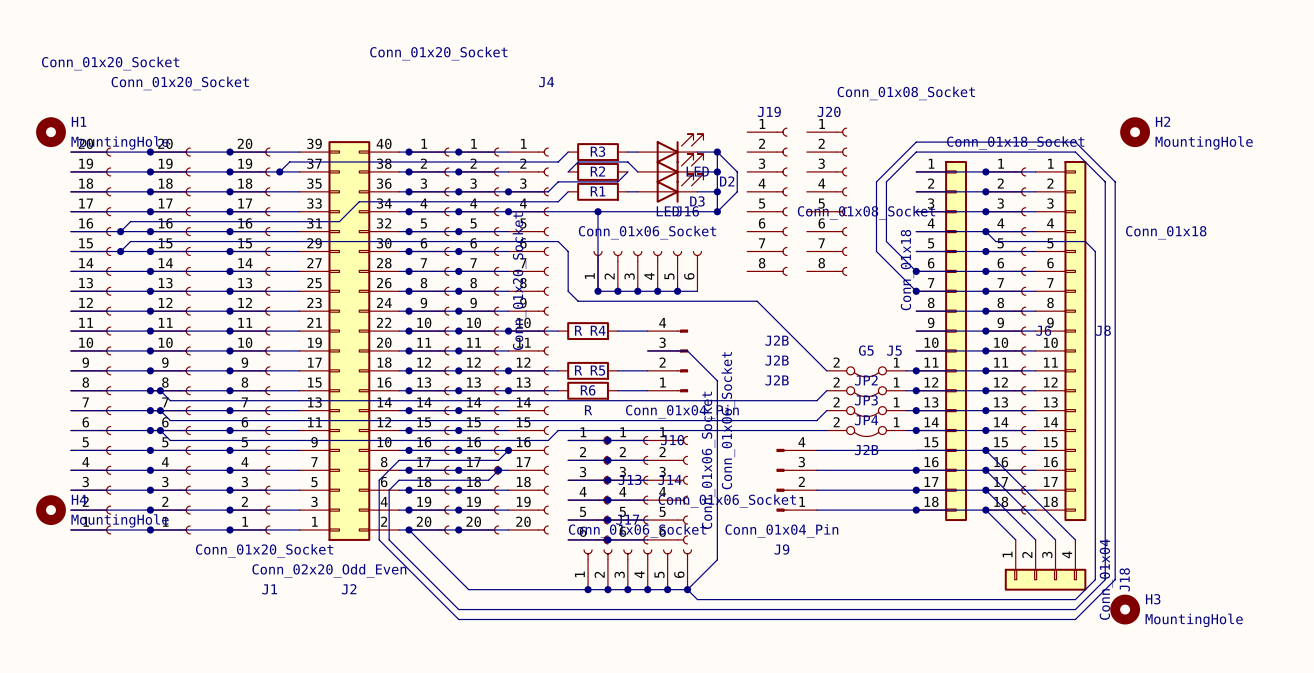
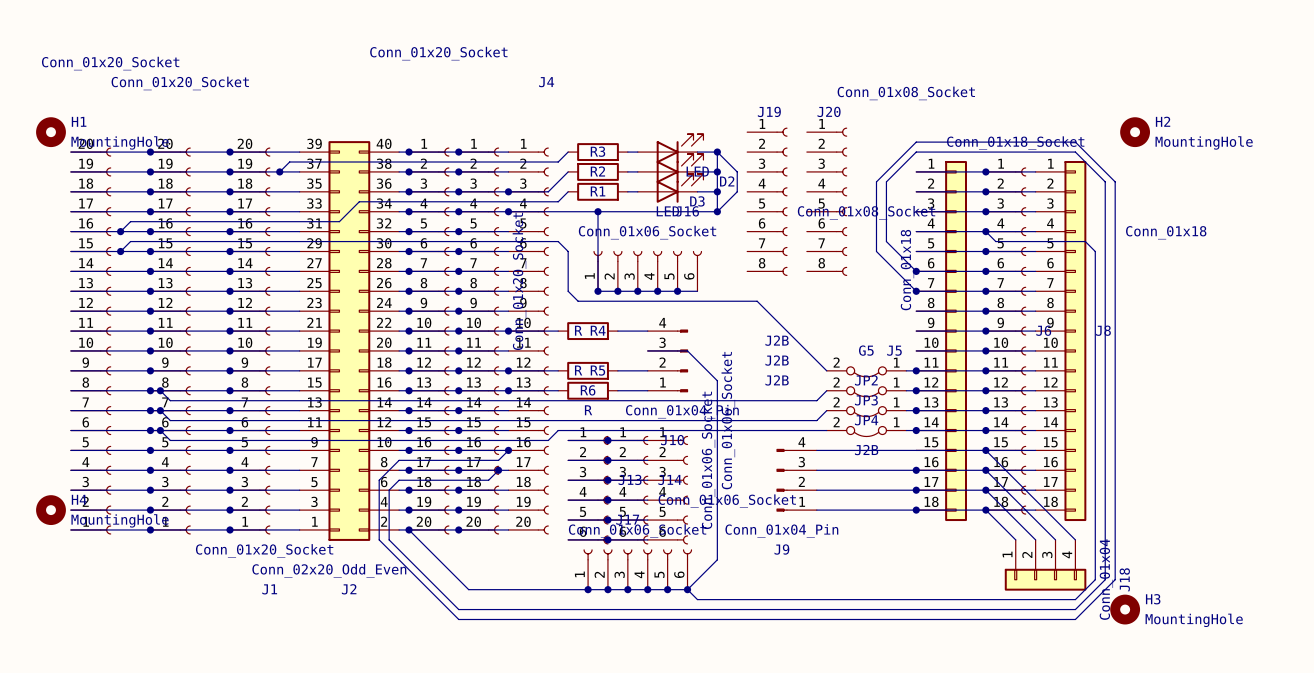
wire: (568, 171) (578, 161) (627, 161) (637, 171) -> (627, 171) (637, 171)
wire: (627, 171) (617, 181) (558, 181) -> (568, 171) (558, 181)

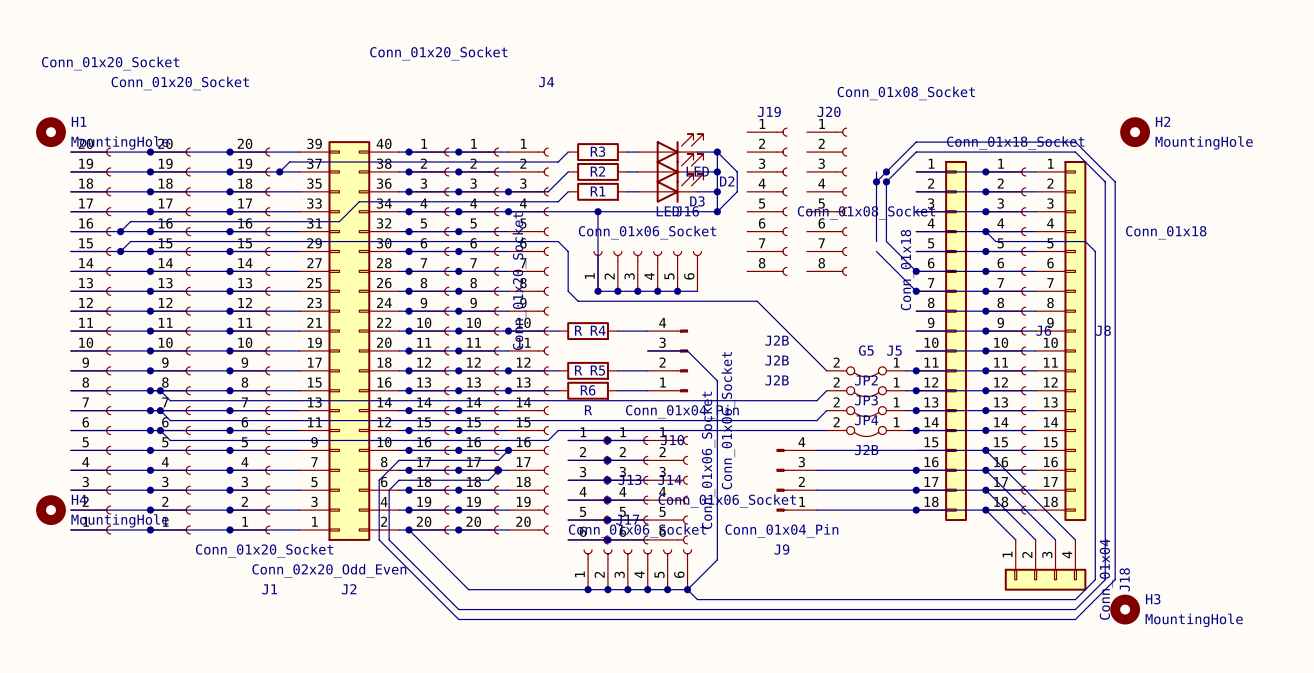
junction: none -> (886, 171)
junction: none -> (876, 181)
junction: none -> (886, 181)
wire: (876, 241) (876, 251) -> (876, 171) (876, 181)

